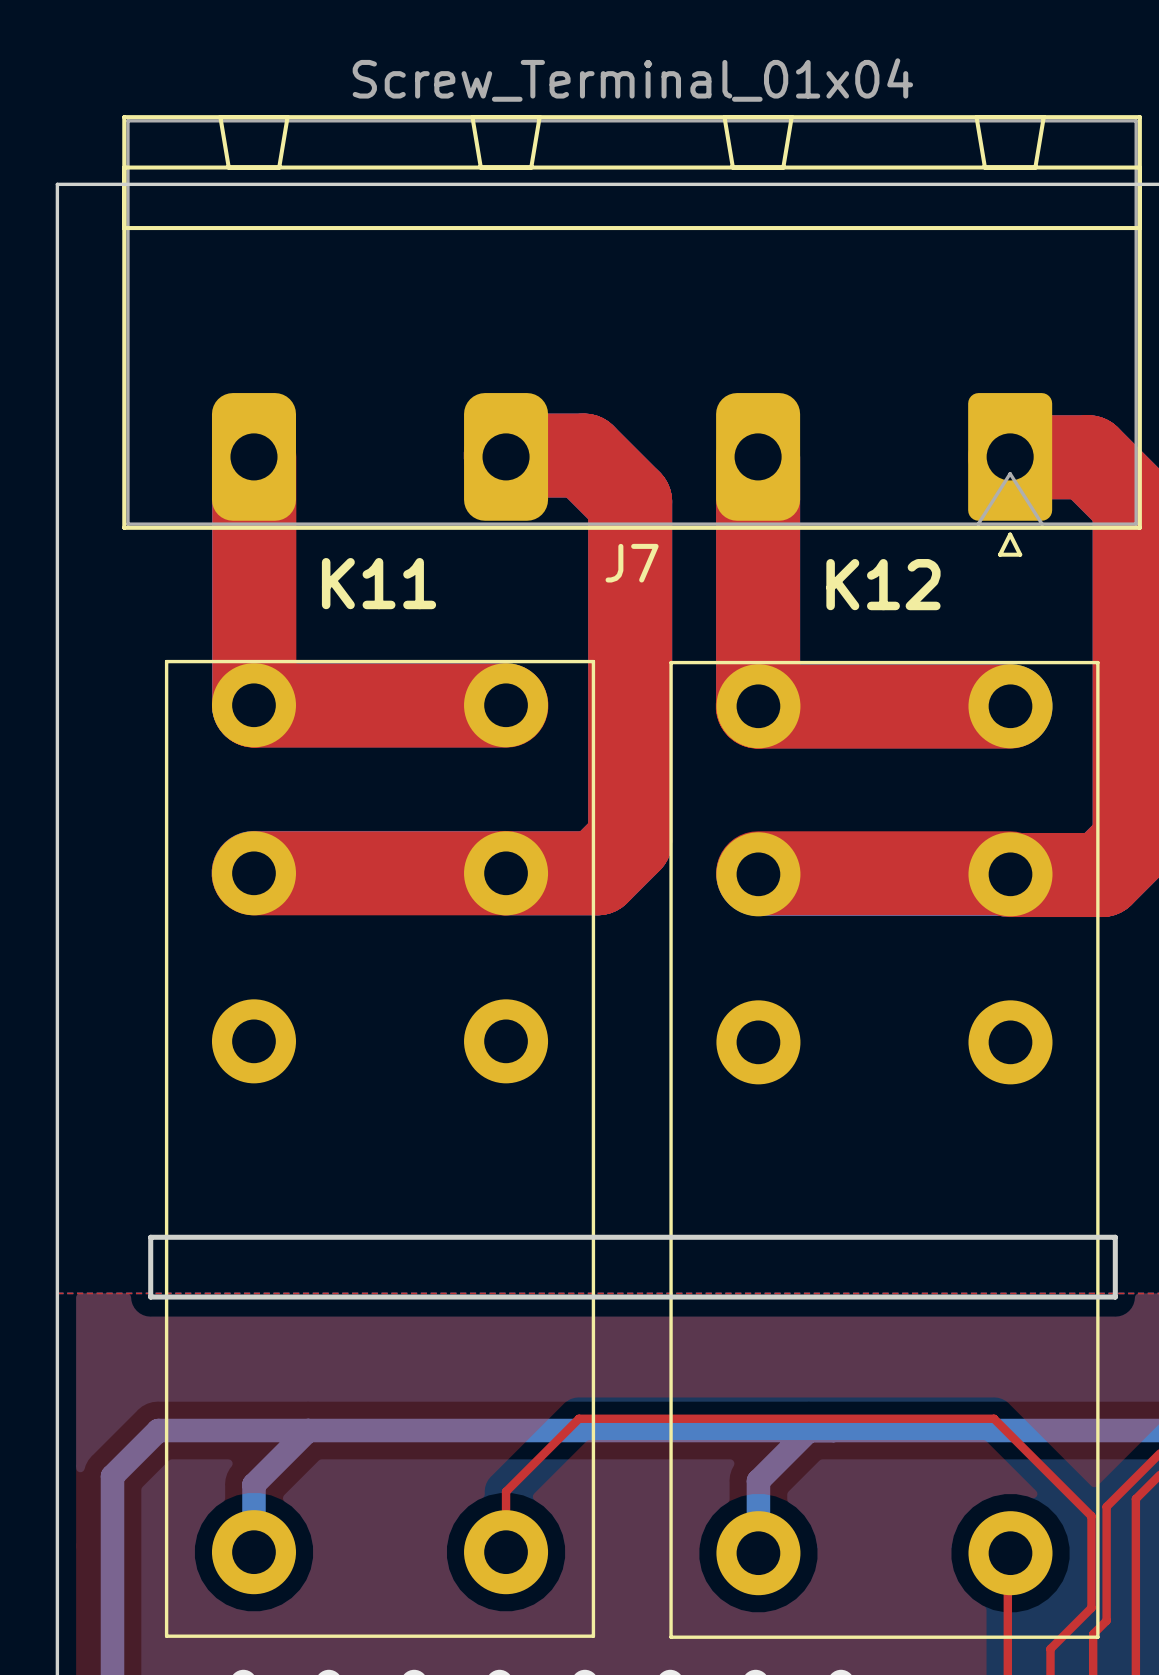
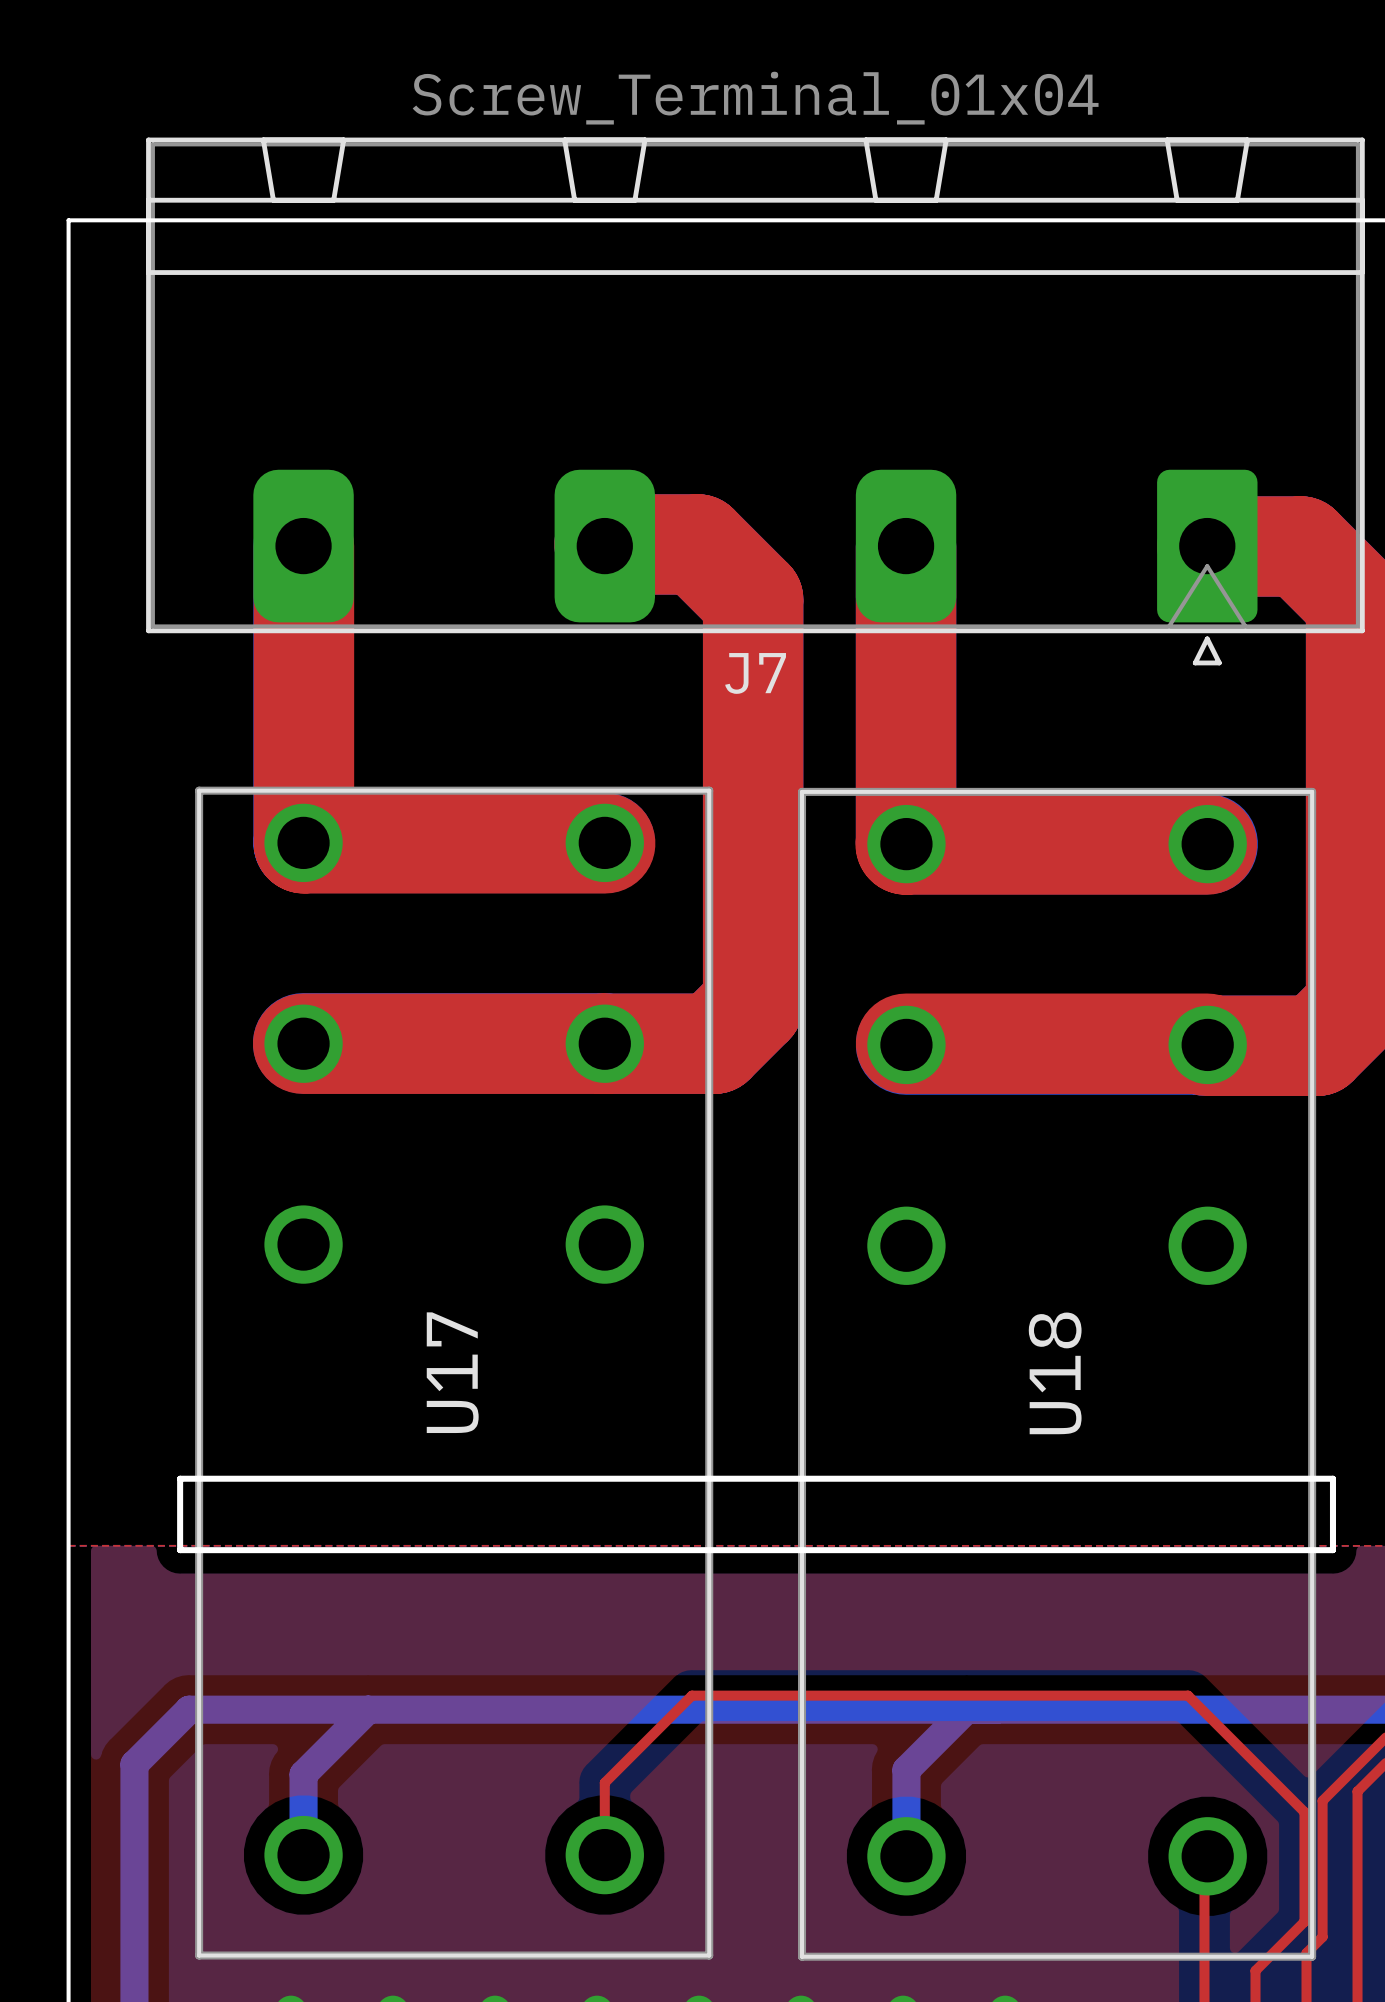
K11: (380, 1148) -> none
U17: none -> (454, 1373)
K12: (884, 1149) -> none
U18: none -> (1057, 1374)

